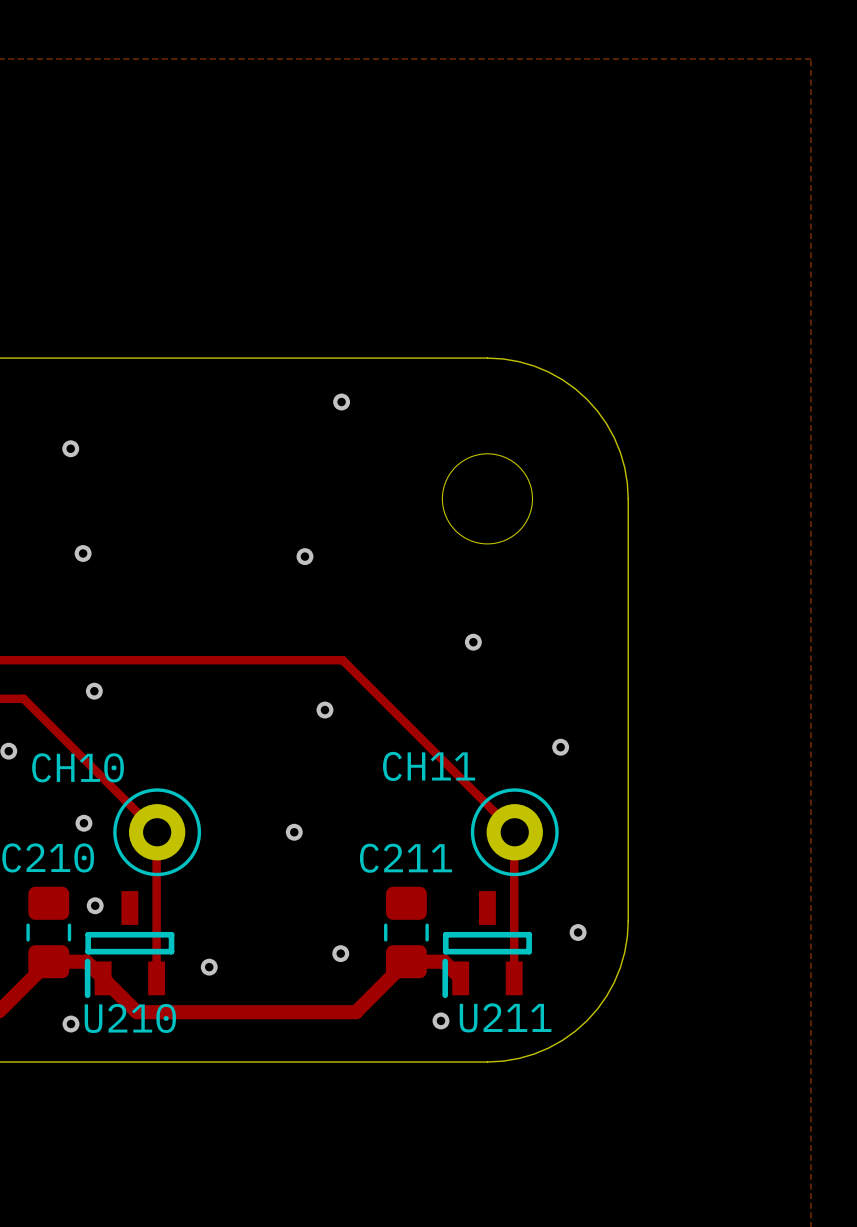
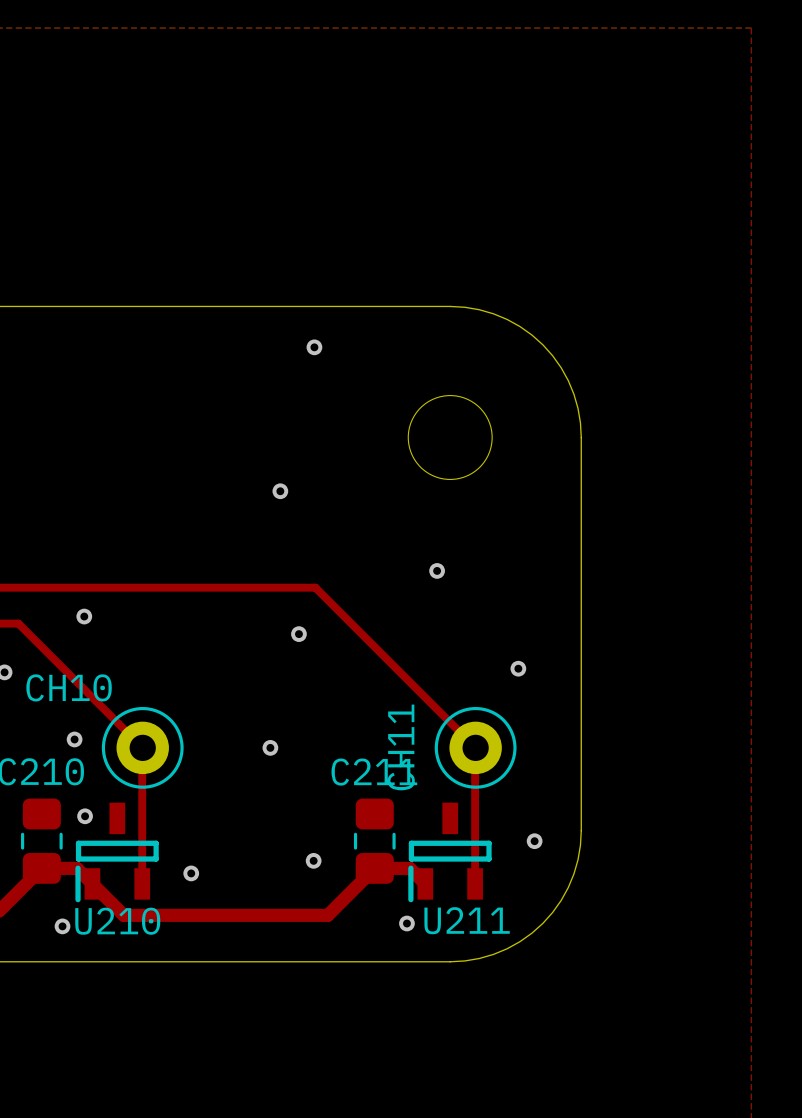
via: (70, 448) -> none
via: (83, 553) -> none
part value rotation: 0° (429, 766) -> 90° counterclockwise (401, 747)

